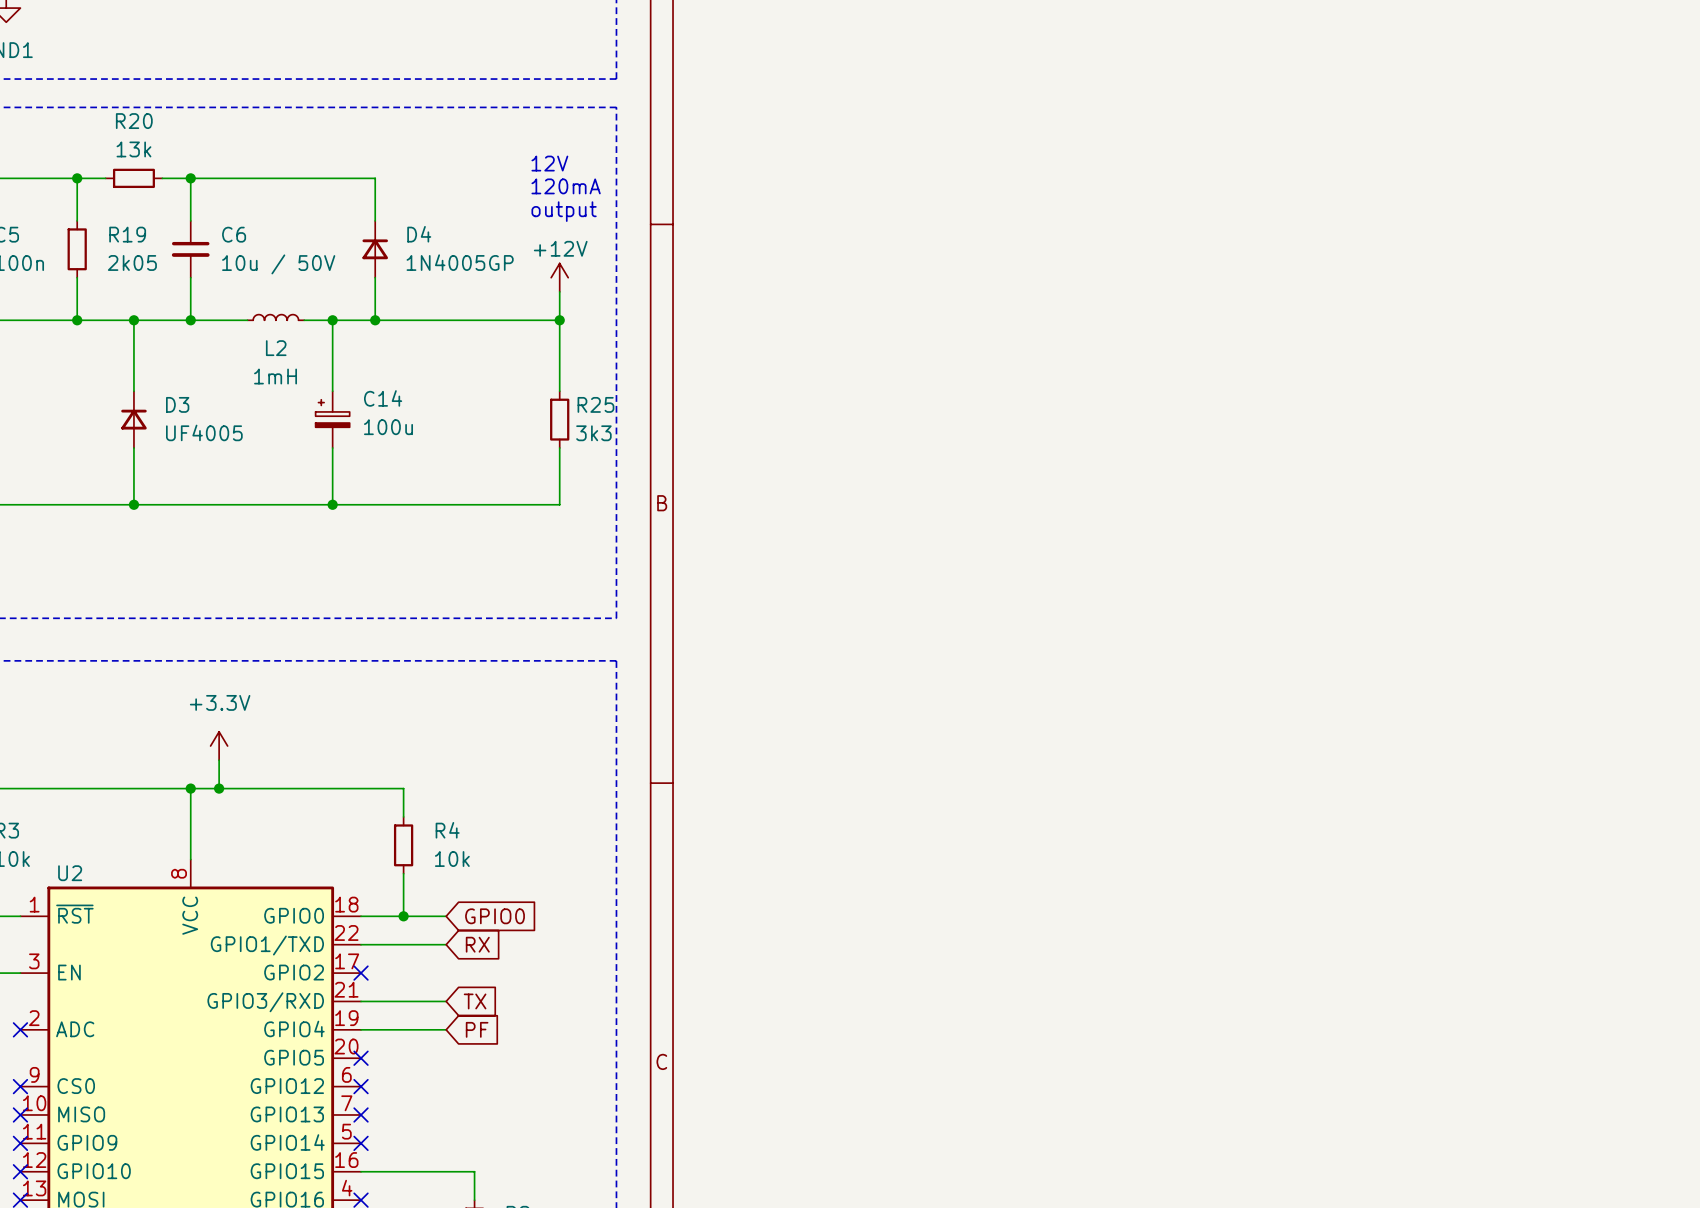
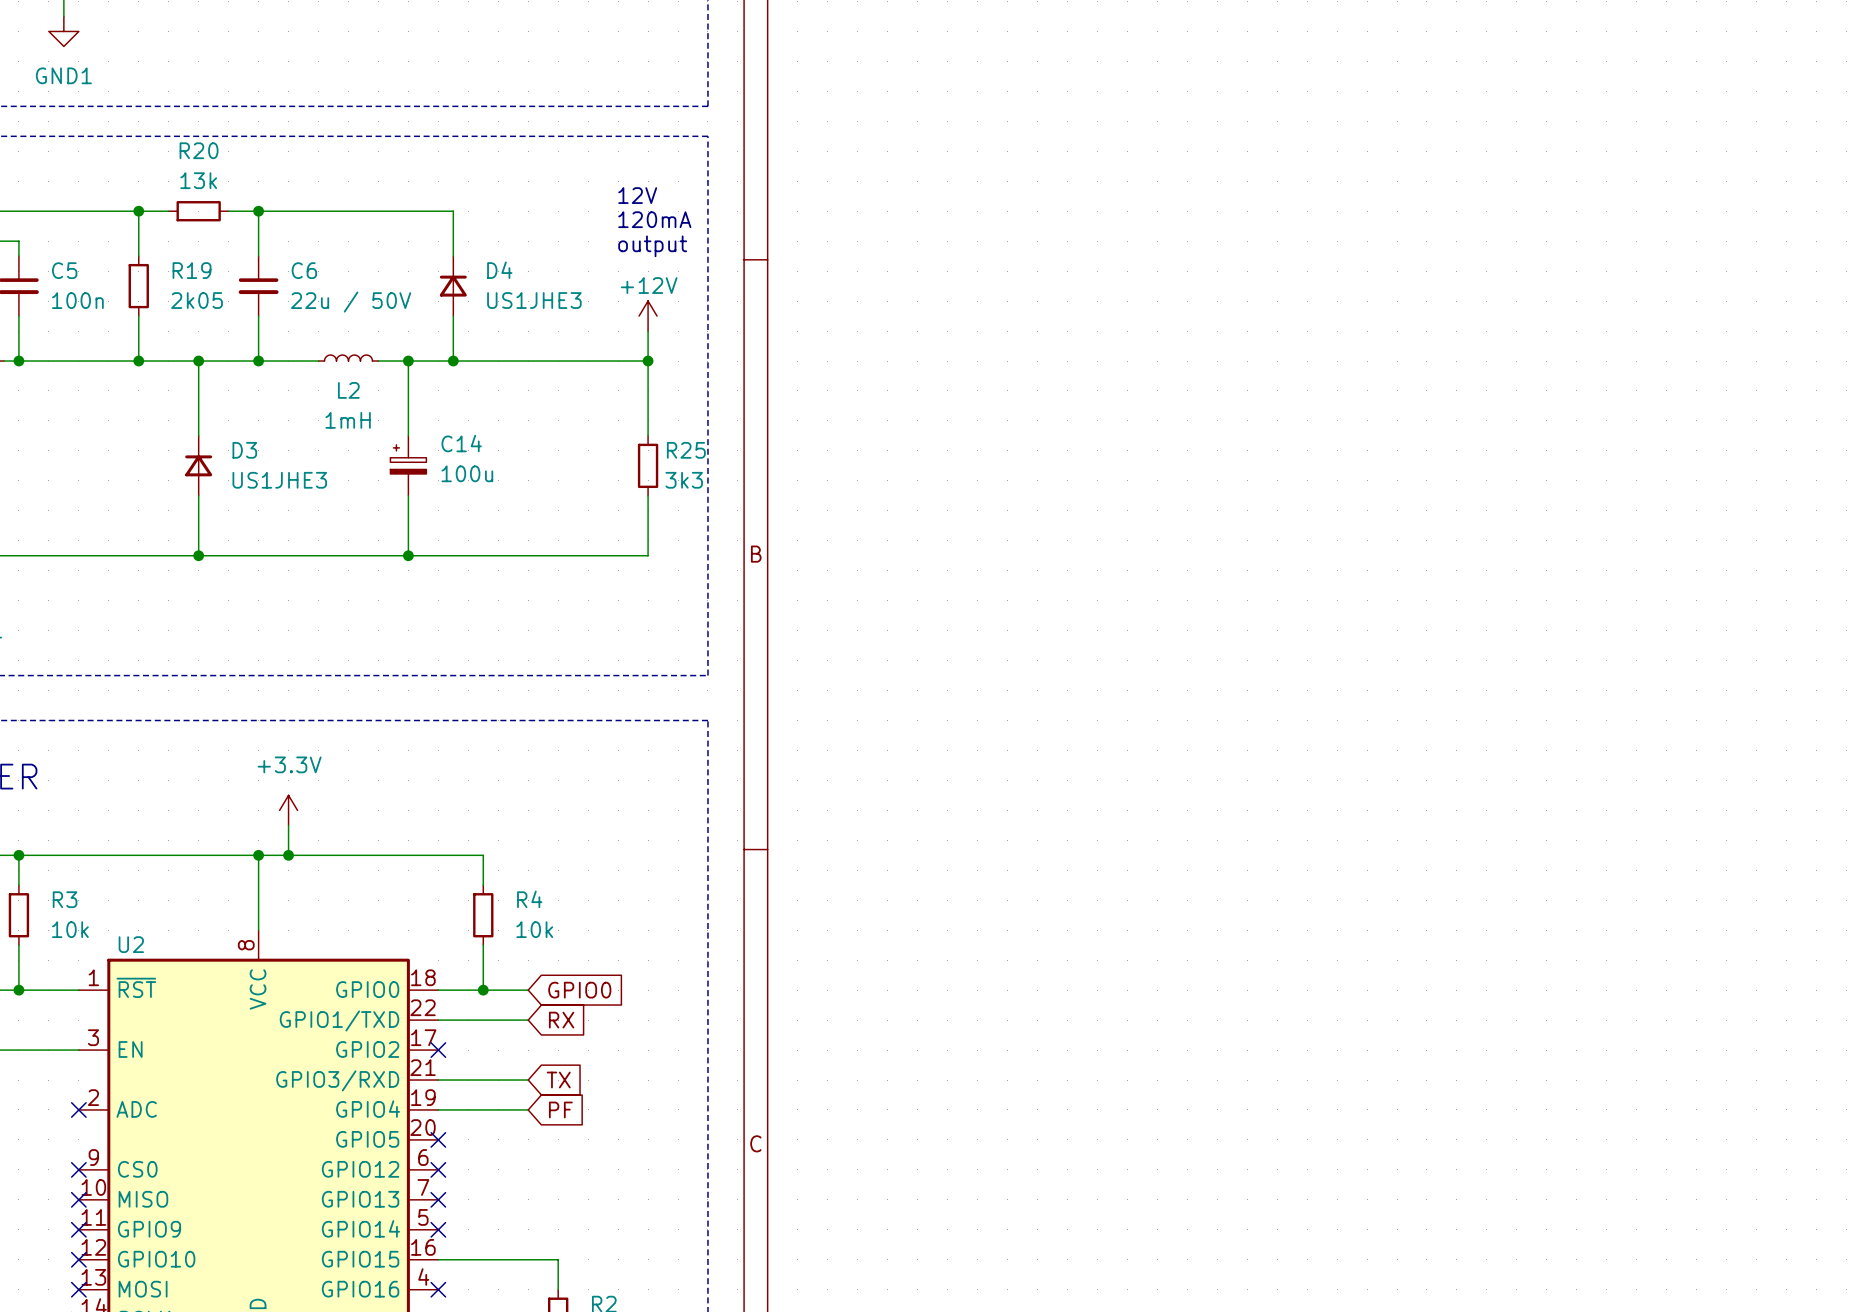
D4 value: 1N4005GP (460, 262) -> US1JHE3 (534, 300)
C6 value: 10u / 50V (278, 264) -> 22u / 50V (351, 302)
D3 value: UF4005 (204, 432) -> US1JHE3 (279, 480)

